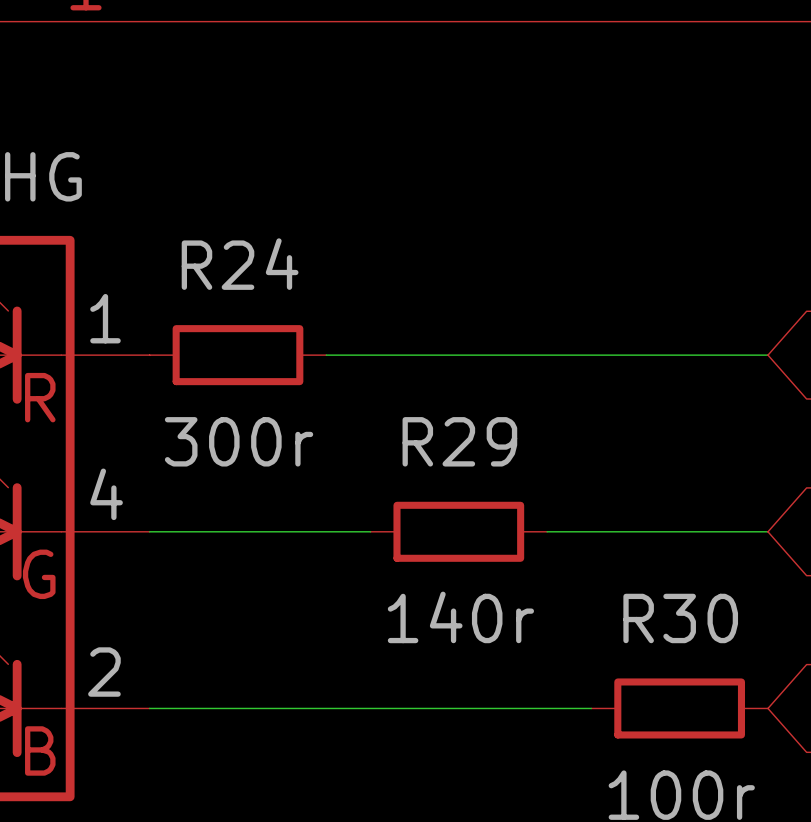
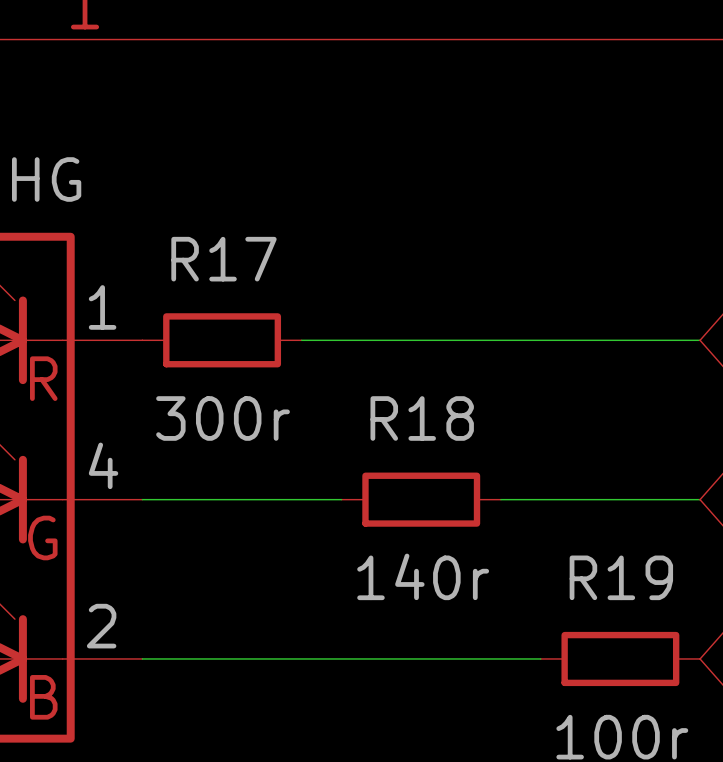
R24 name: R24 (240, 264) -> R17 (223, 259)
R29 name: R29 (459, 441) -> R18 (422, 418)
R30 name: R30 (680, 618) -> R19 (621, 577)

